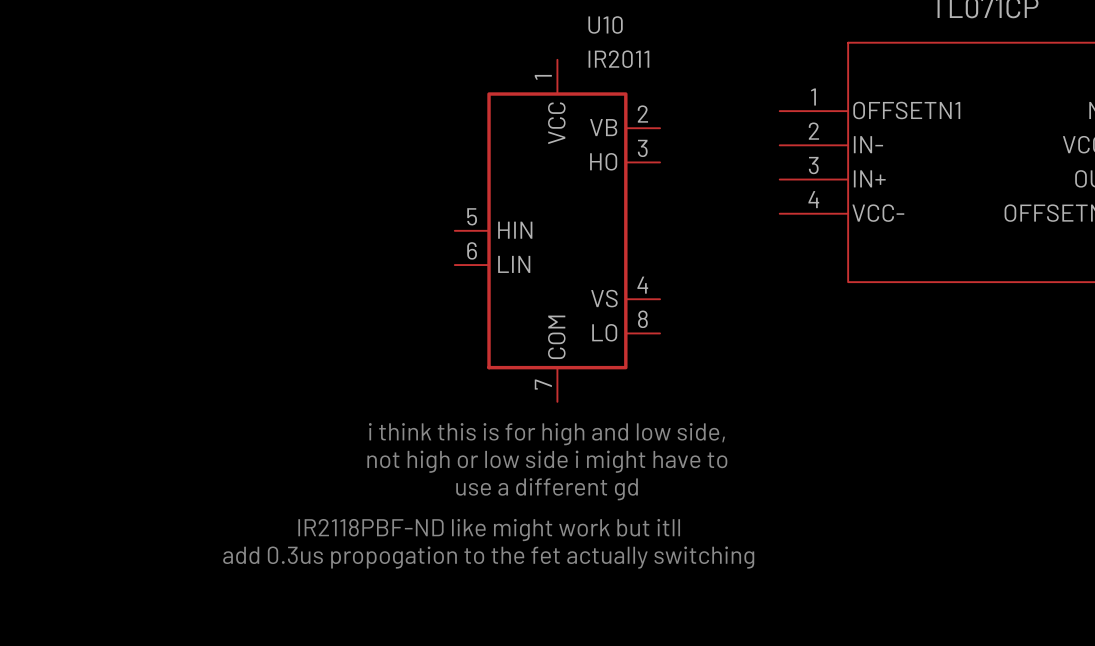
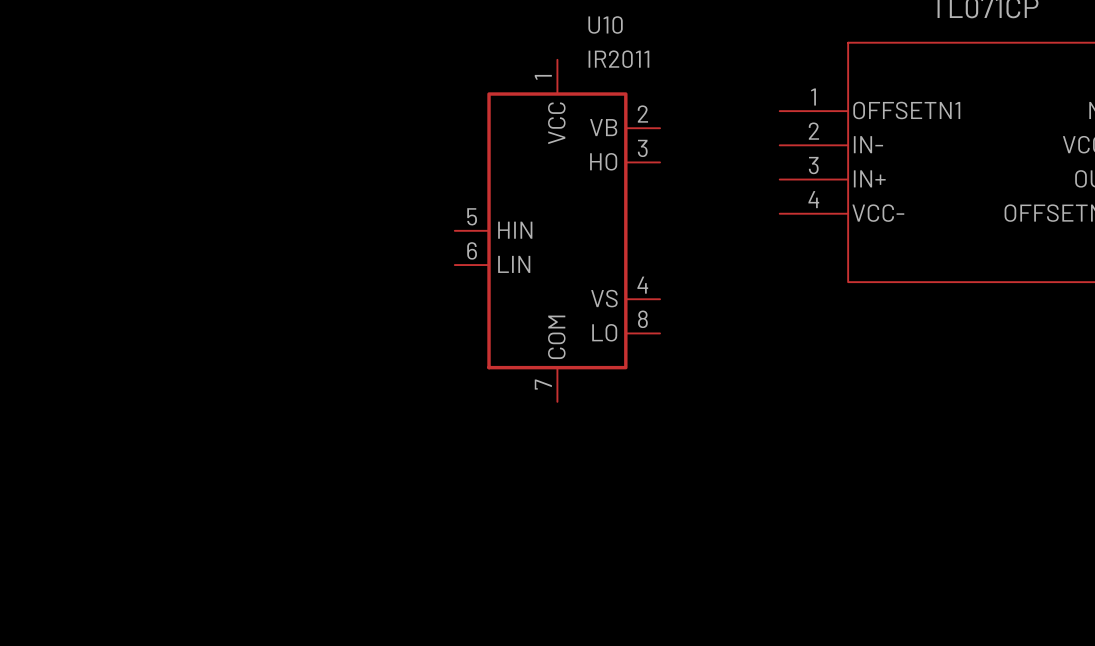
text: i think this is for high and low side, (546, 434) -> none
text: not high or low side i might have to (547, 461) -> none
text: use a different gd (547, 489) -> none
text: IR2118PBF-ND like might work but itll (489, 530) -> none
text: add 0.3us propogation to the fet actually switching (488, 557) -> none

